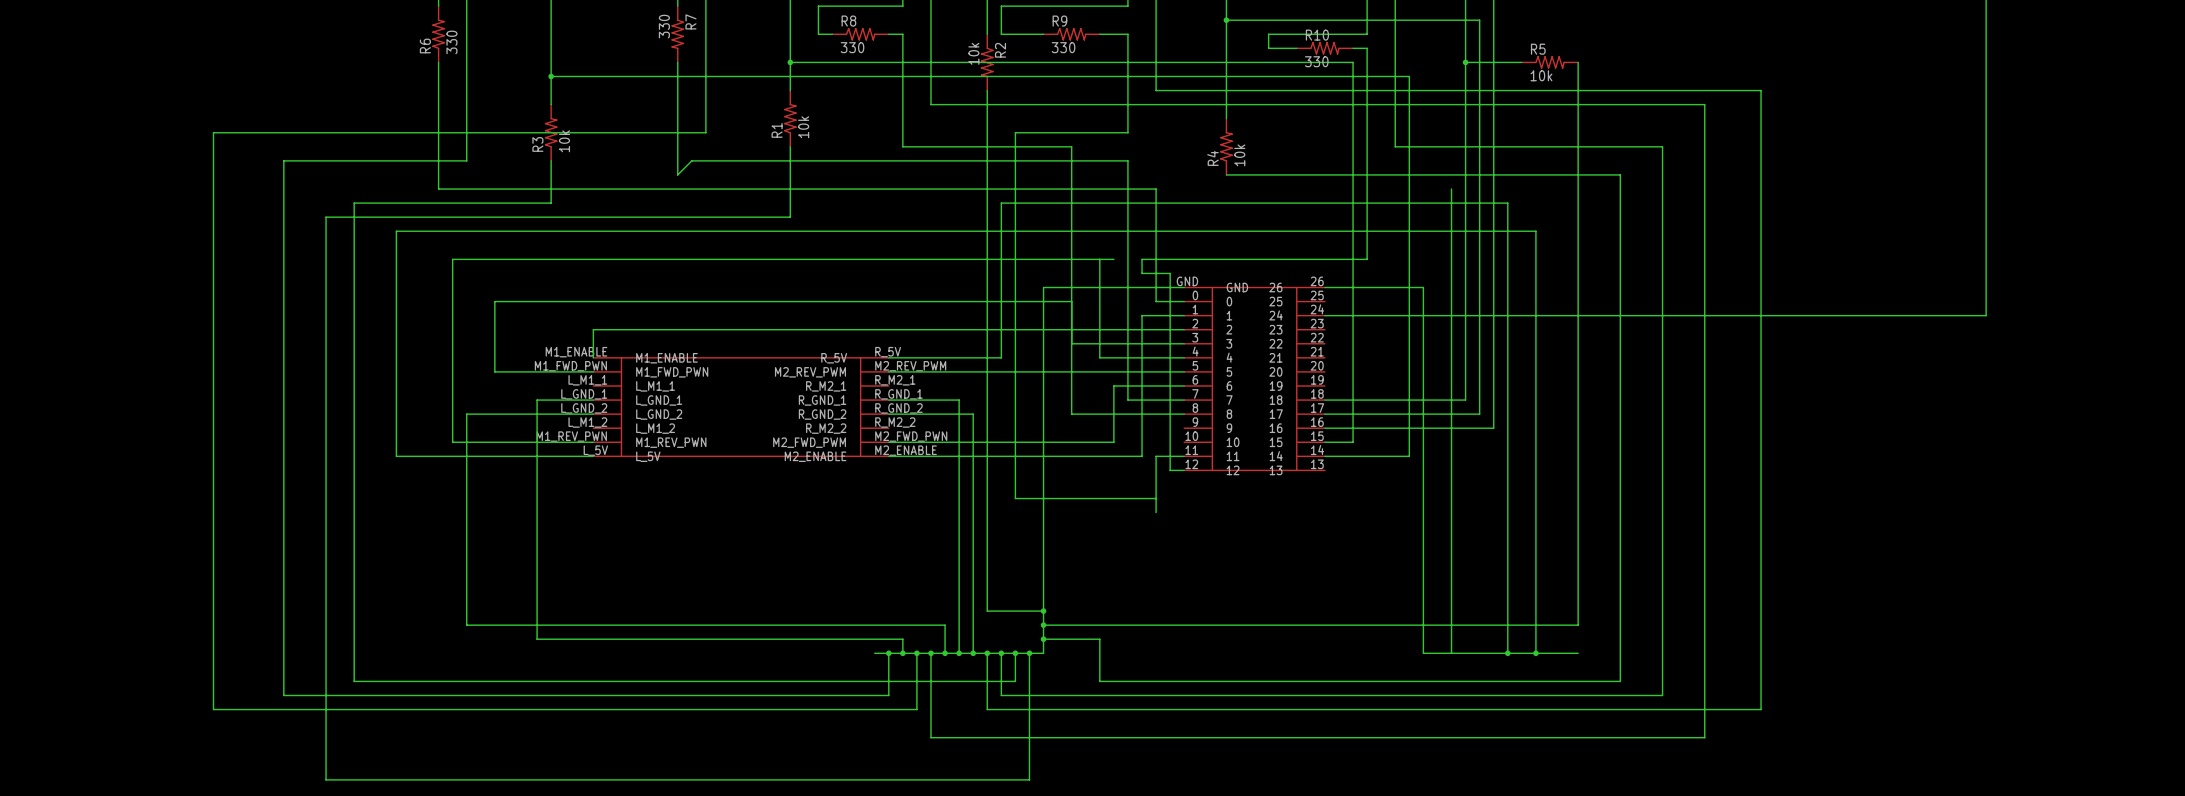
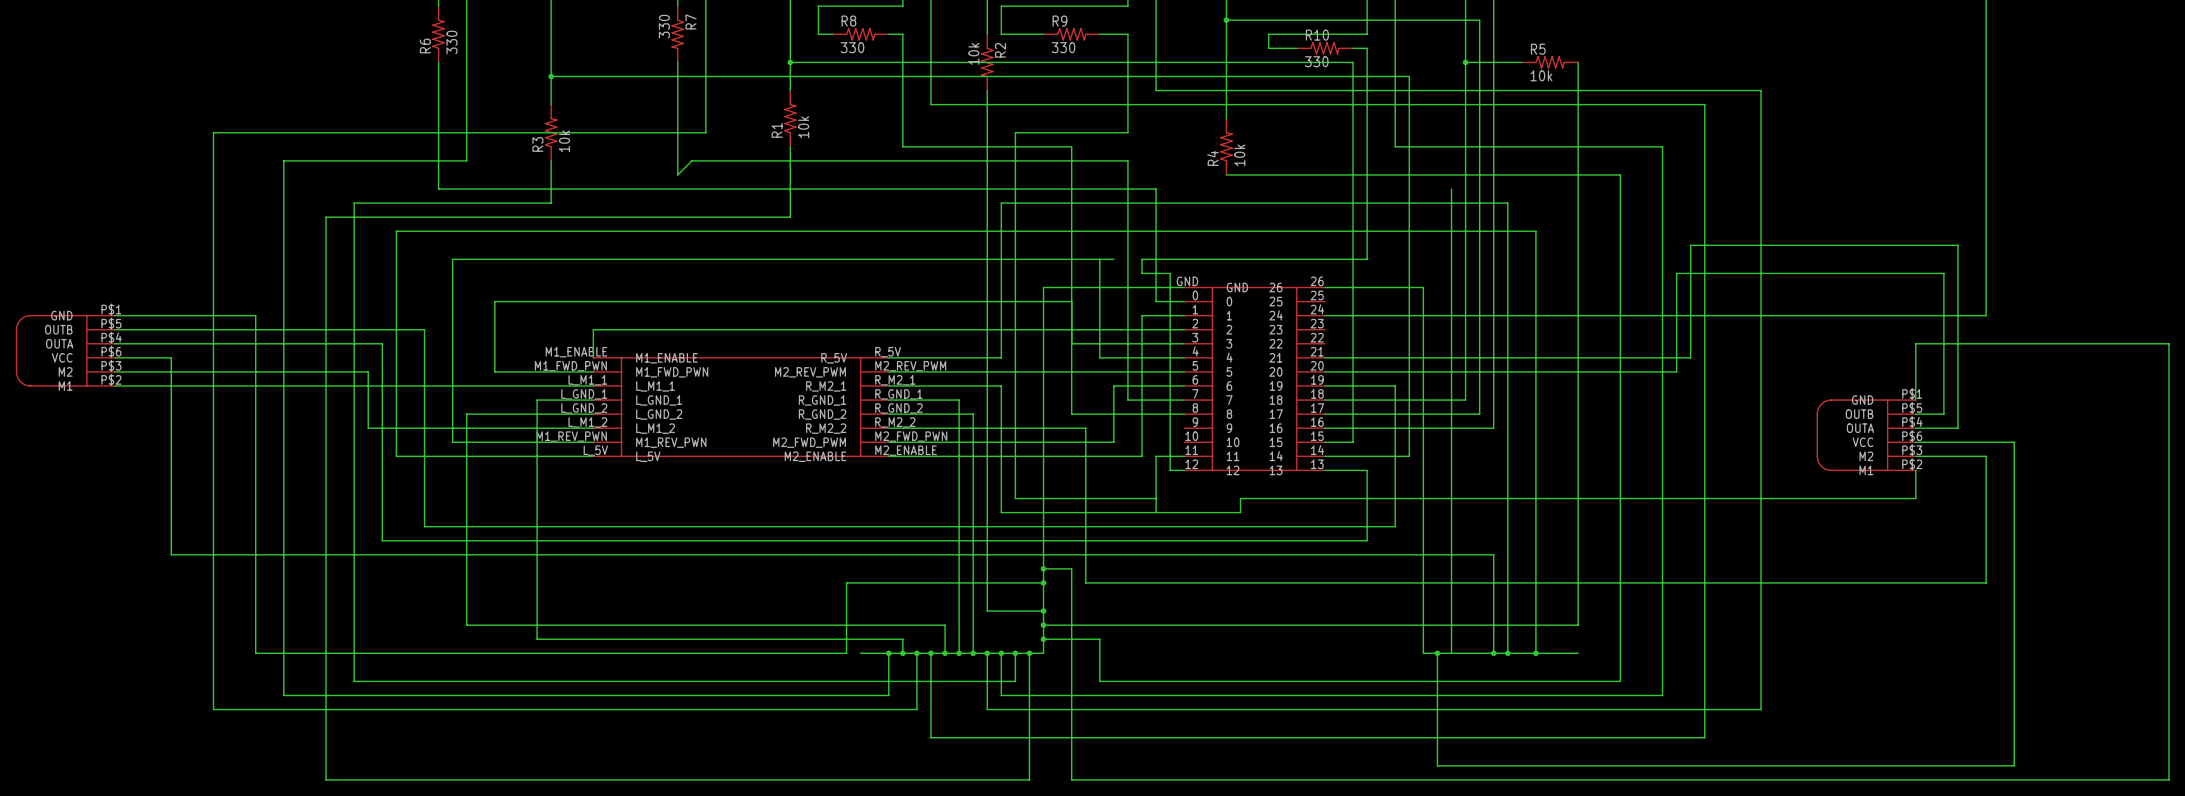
wire: none -> (115, 315) (255, 315) (255, 653) (846, 653) (846, 582) (1043, 582)
wire: none -> (115, 329) (424, 329) (424, 526) (1395, 526) (1395, 385) (1324, 385)
wire: none -> (115, 343) (382, 343) (382, 540) (1367, 540) (1367, 470) (1324, 470)
part: none -> (65, 350)
wire: none -> (115, 357) (171, 357) (171, 554) (1493, 554) (1493, 653)
wire: none -> (1324, 357) (1690, 357) (1690, 245) (1957, 245) (1957, 428) (1915, 428)
wire: none -> (115, 371) (368, 371) (368, 428) (593, 428)
wire: none -> (1324, 371) (1676, 371) (1676, 273) (1943, 273) (1943, 414) (1915, 414)
wire: none -> (115, 385) (593, 385)
wire: none -> (888, 385) (1001, 385) (1001, 512) (1240, 512) (1240, 498) (1915, 498) (1915, 470)
wire: none -> (1915, 400) (1915, 343) (2169, 343) (2169, 779) (1071, 779) (1071, 568) (1043, 568)
wire: none -> (888, 428) (1085, 428) (1085, 582) (1986, 582) (1986, 456) (1915, 456)
part: none -> (1866, 435)
wire: none -> (1915, 442) (2014, 442) (2014, 765) (1437, 765) (1437, 653)
junction: none -> (1043, 568)
junction: none -> (1043, 582)
wire: none -> (860, 653) (874, 653)
junction: none -> (1437, 653)
junction: none -> (1493, 653)

